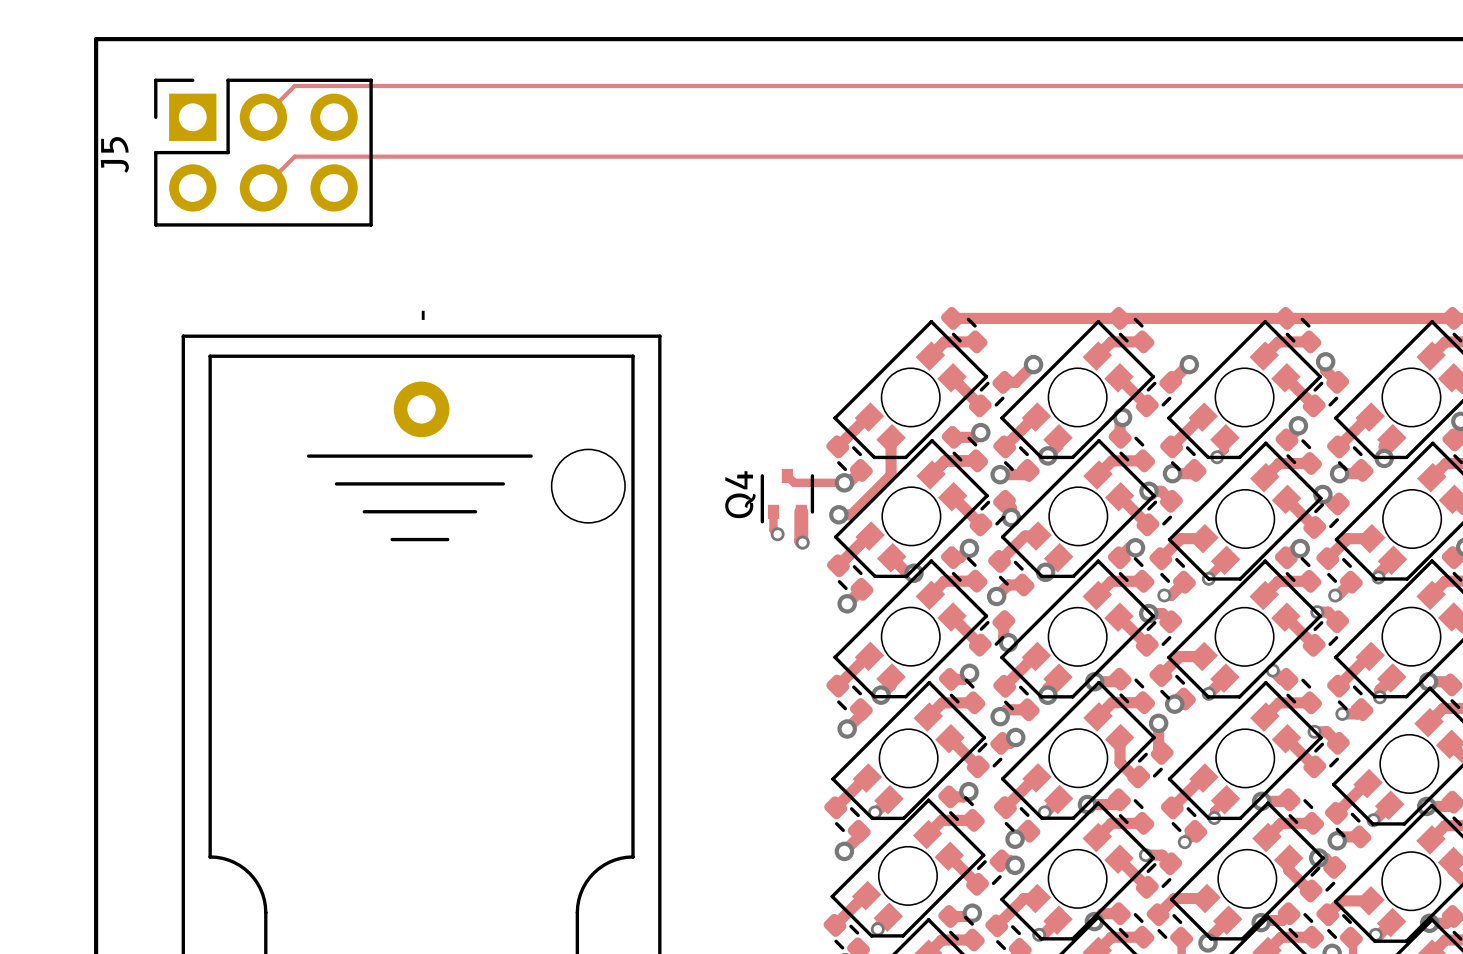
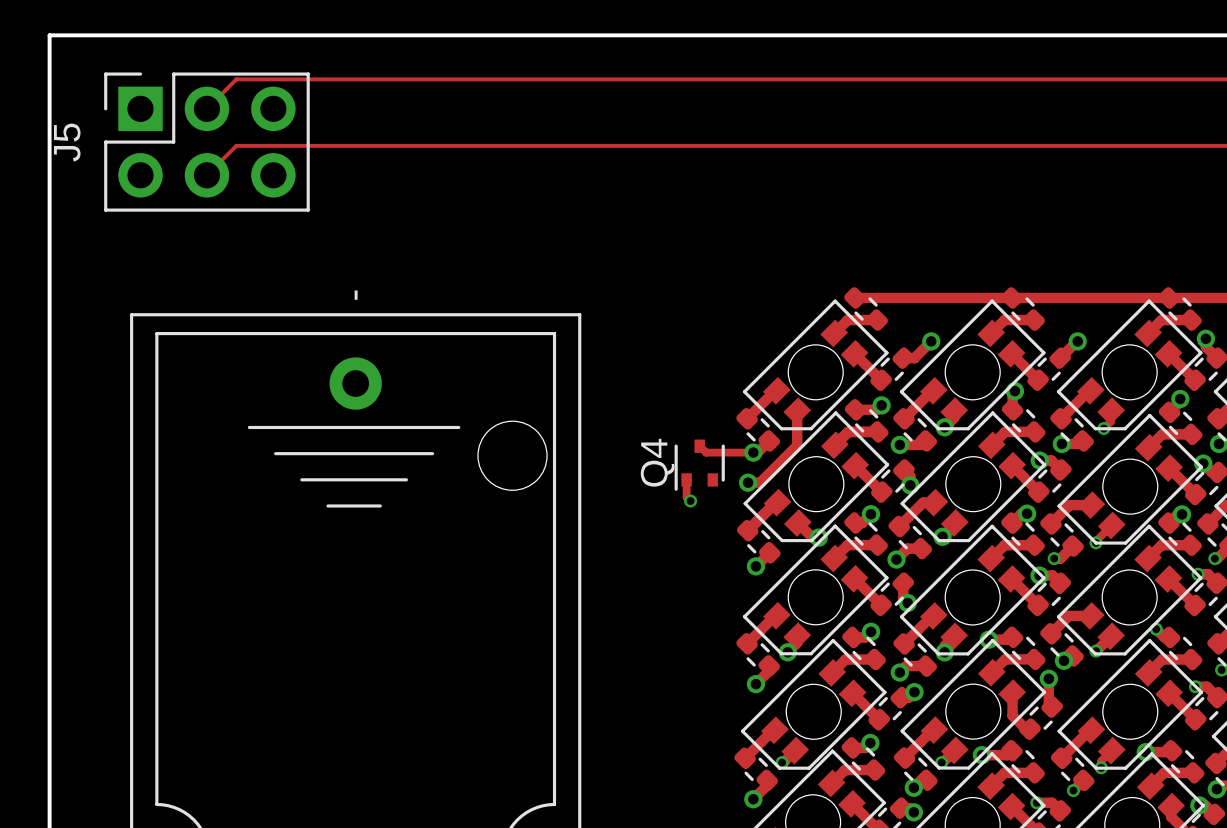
track: (801, 511) (802, 542) -> none
via: (802, 542) -> none

